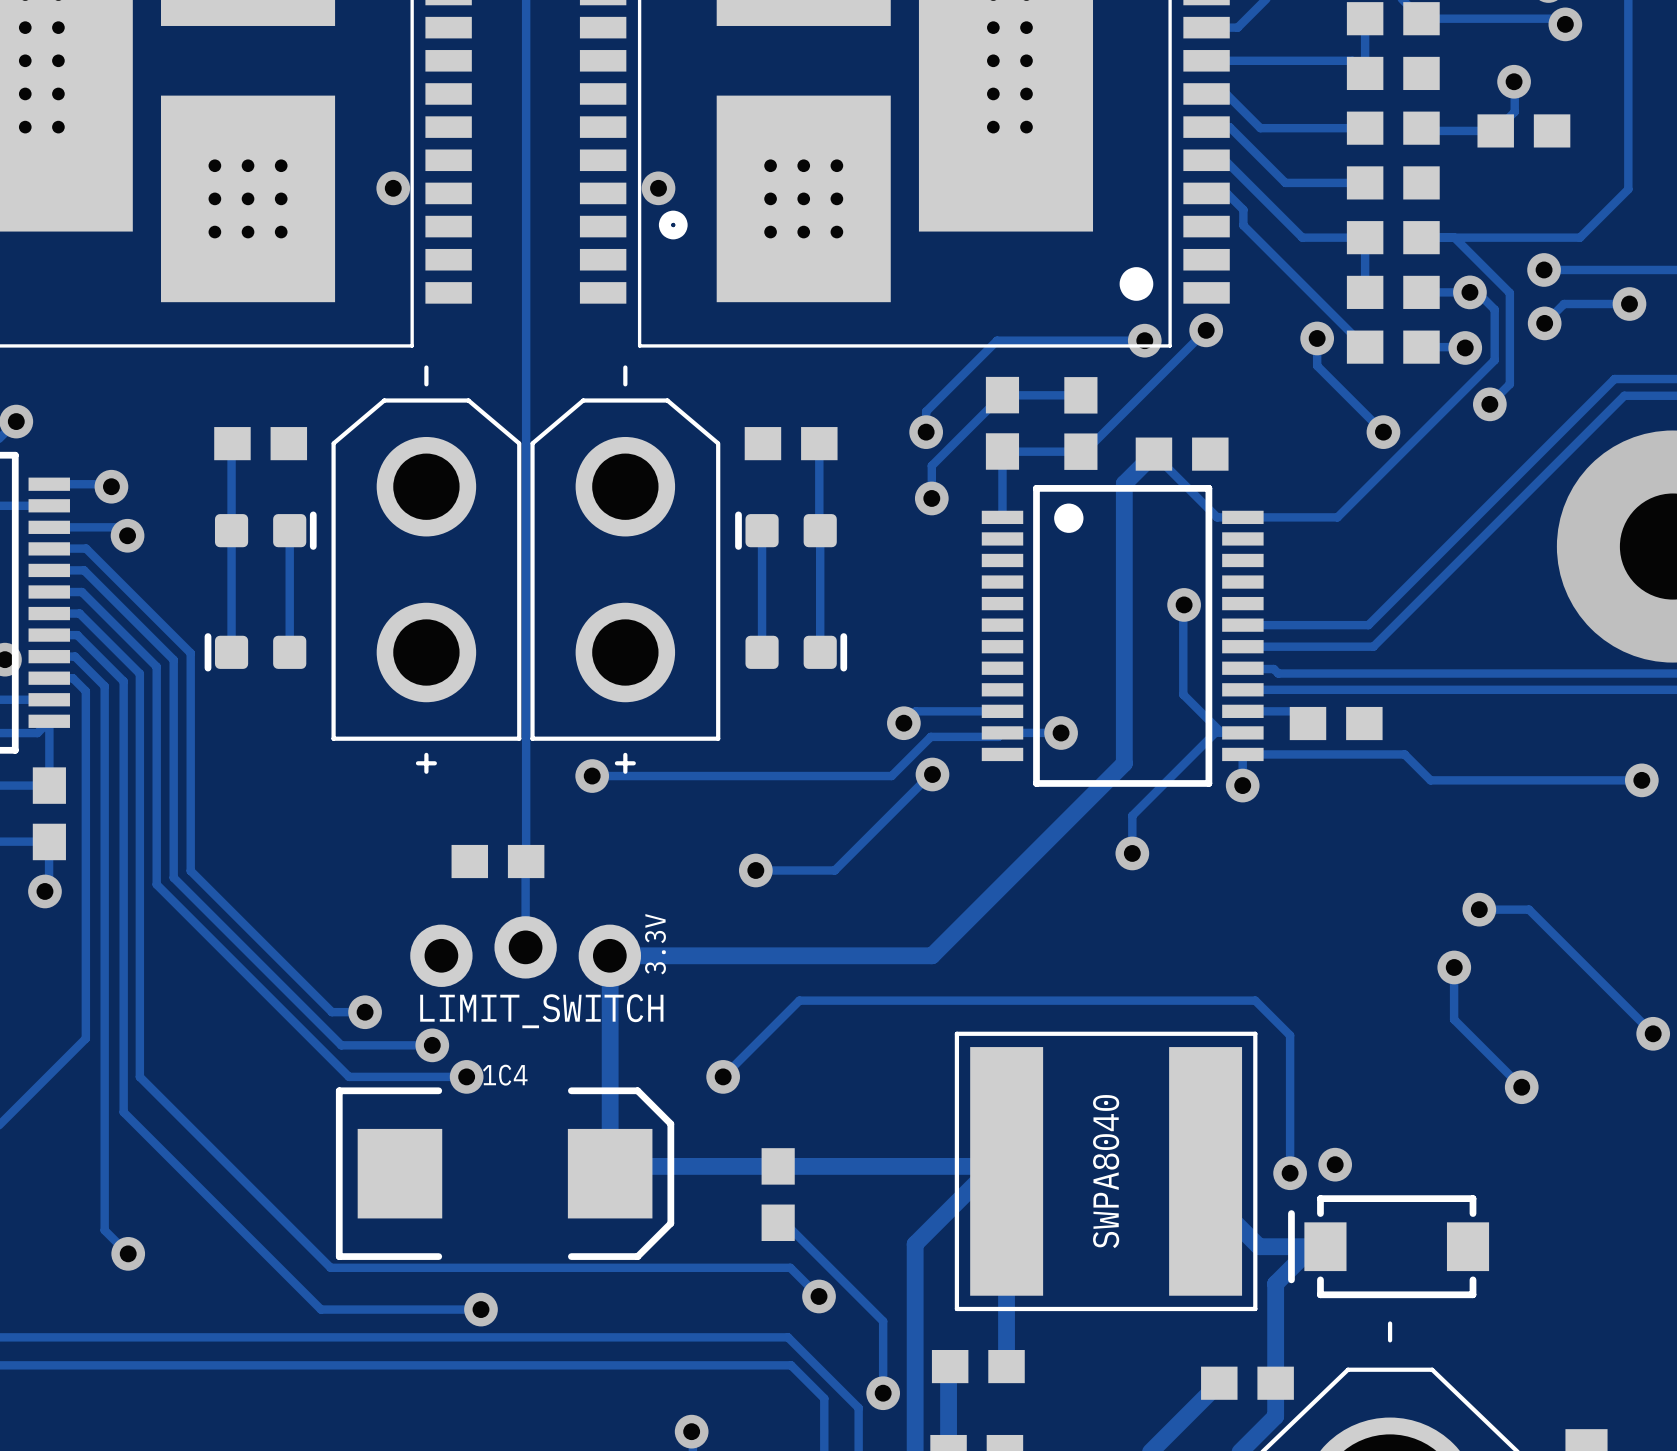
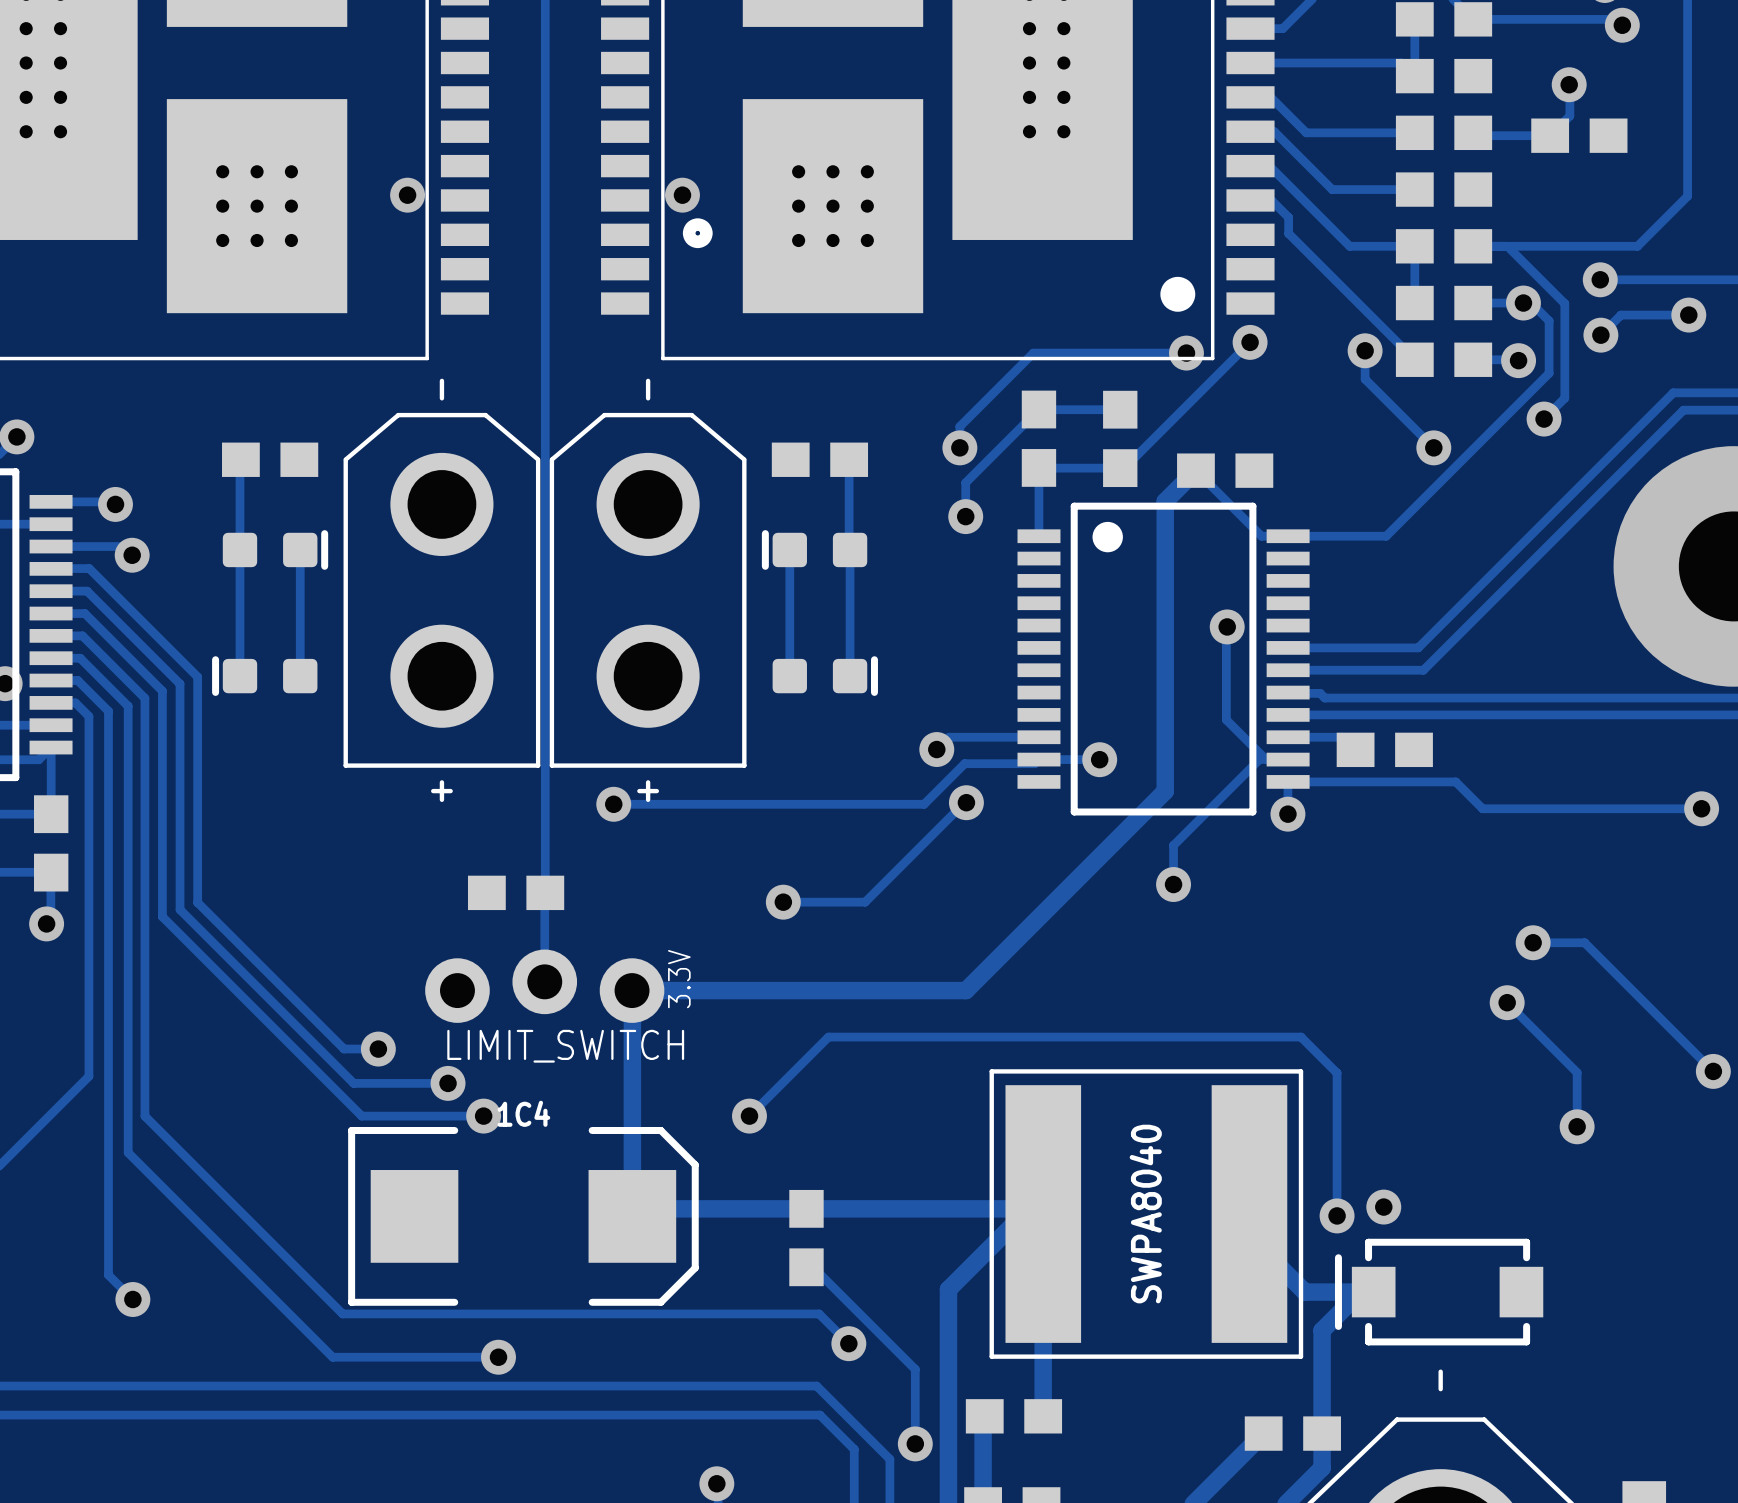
track: (1454, 967) (1454, 1019) (1521, 1087) -> (1507, 1002) (1577, 1072) (1577, 1126)

